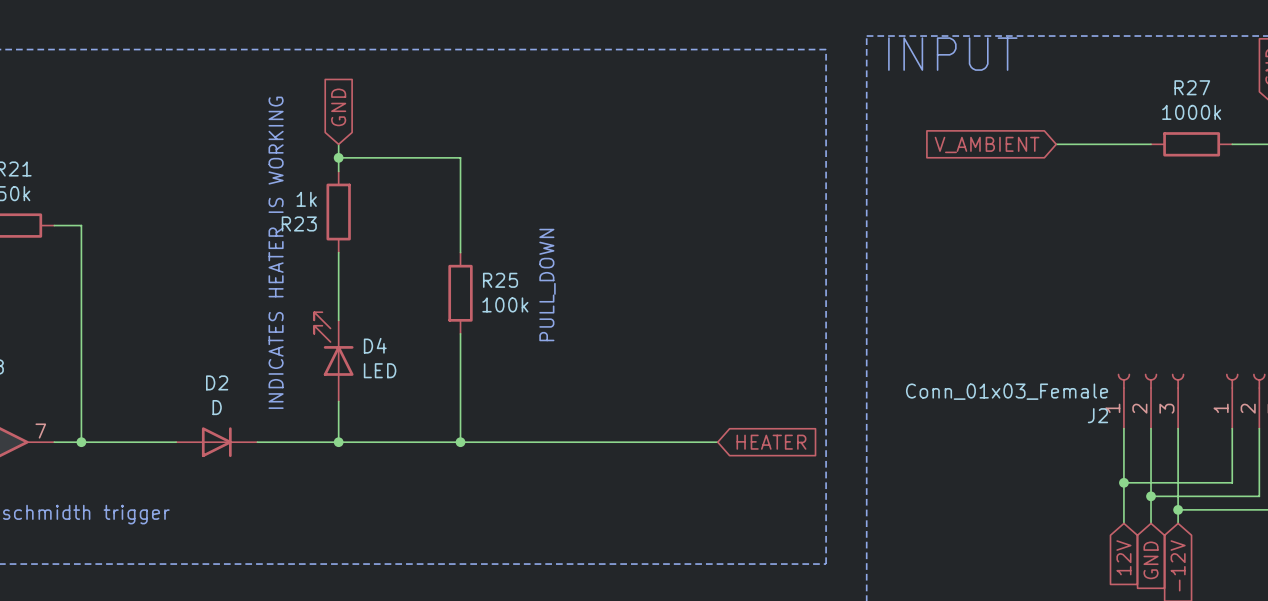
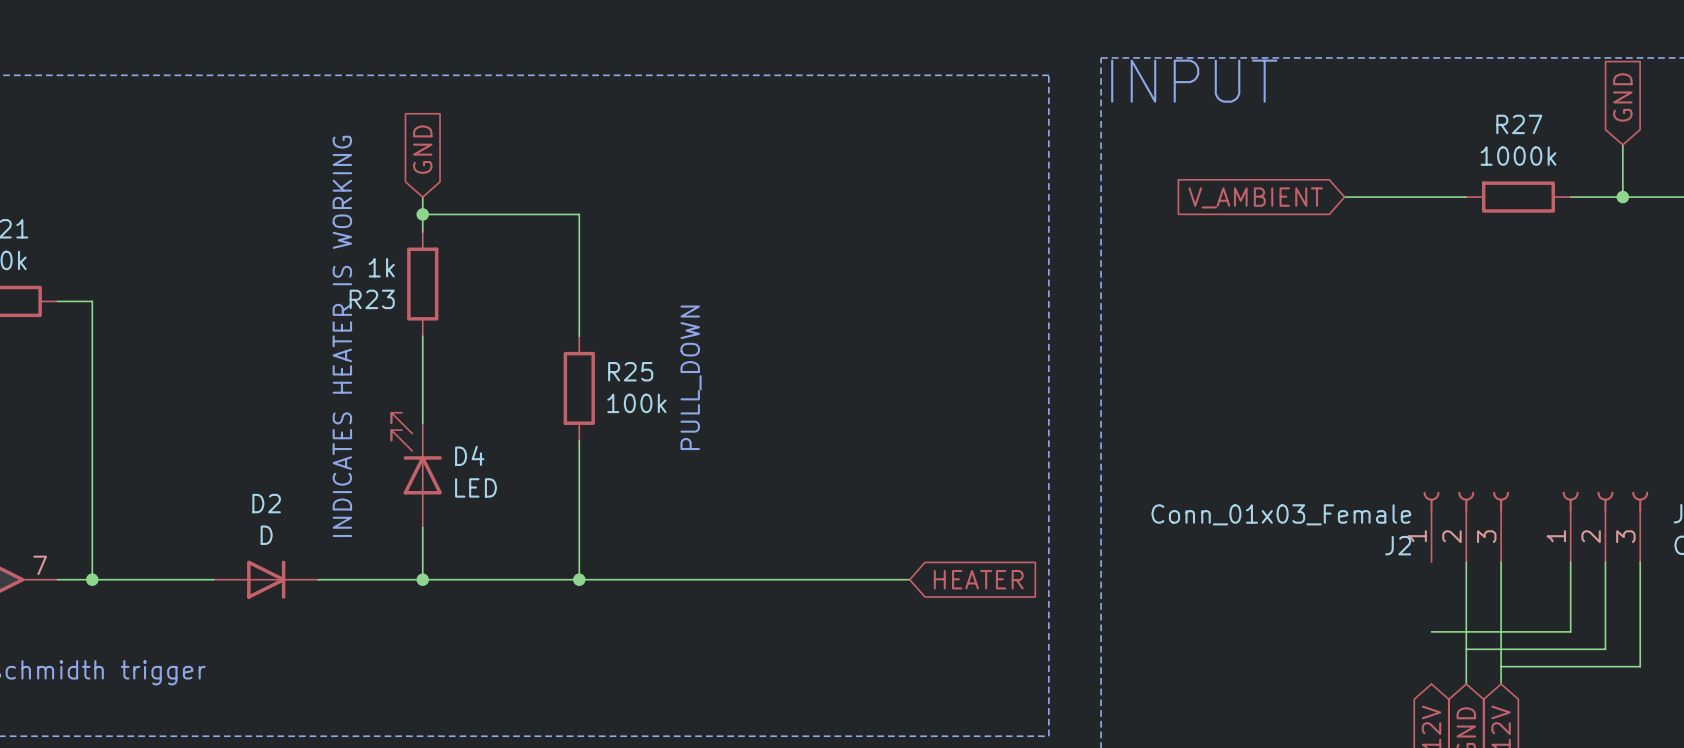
text position: INPUT (952, 54) -> INPUT (1194, 81)
wire: (1123, 428) (1123, 523) -> none
junction: (1123, 482) -> none
junction: (1151, 496) -> none
junction: (1178, 509) -> none

